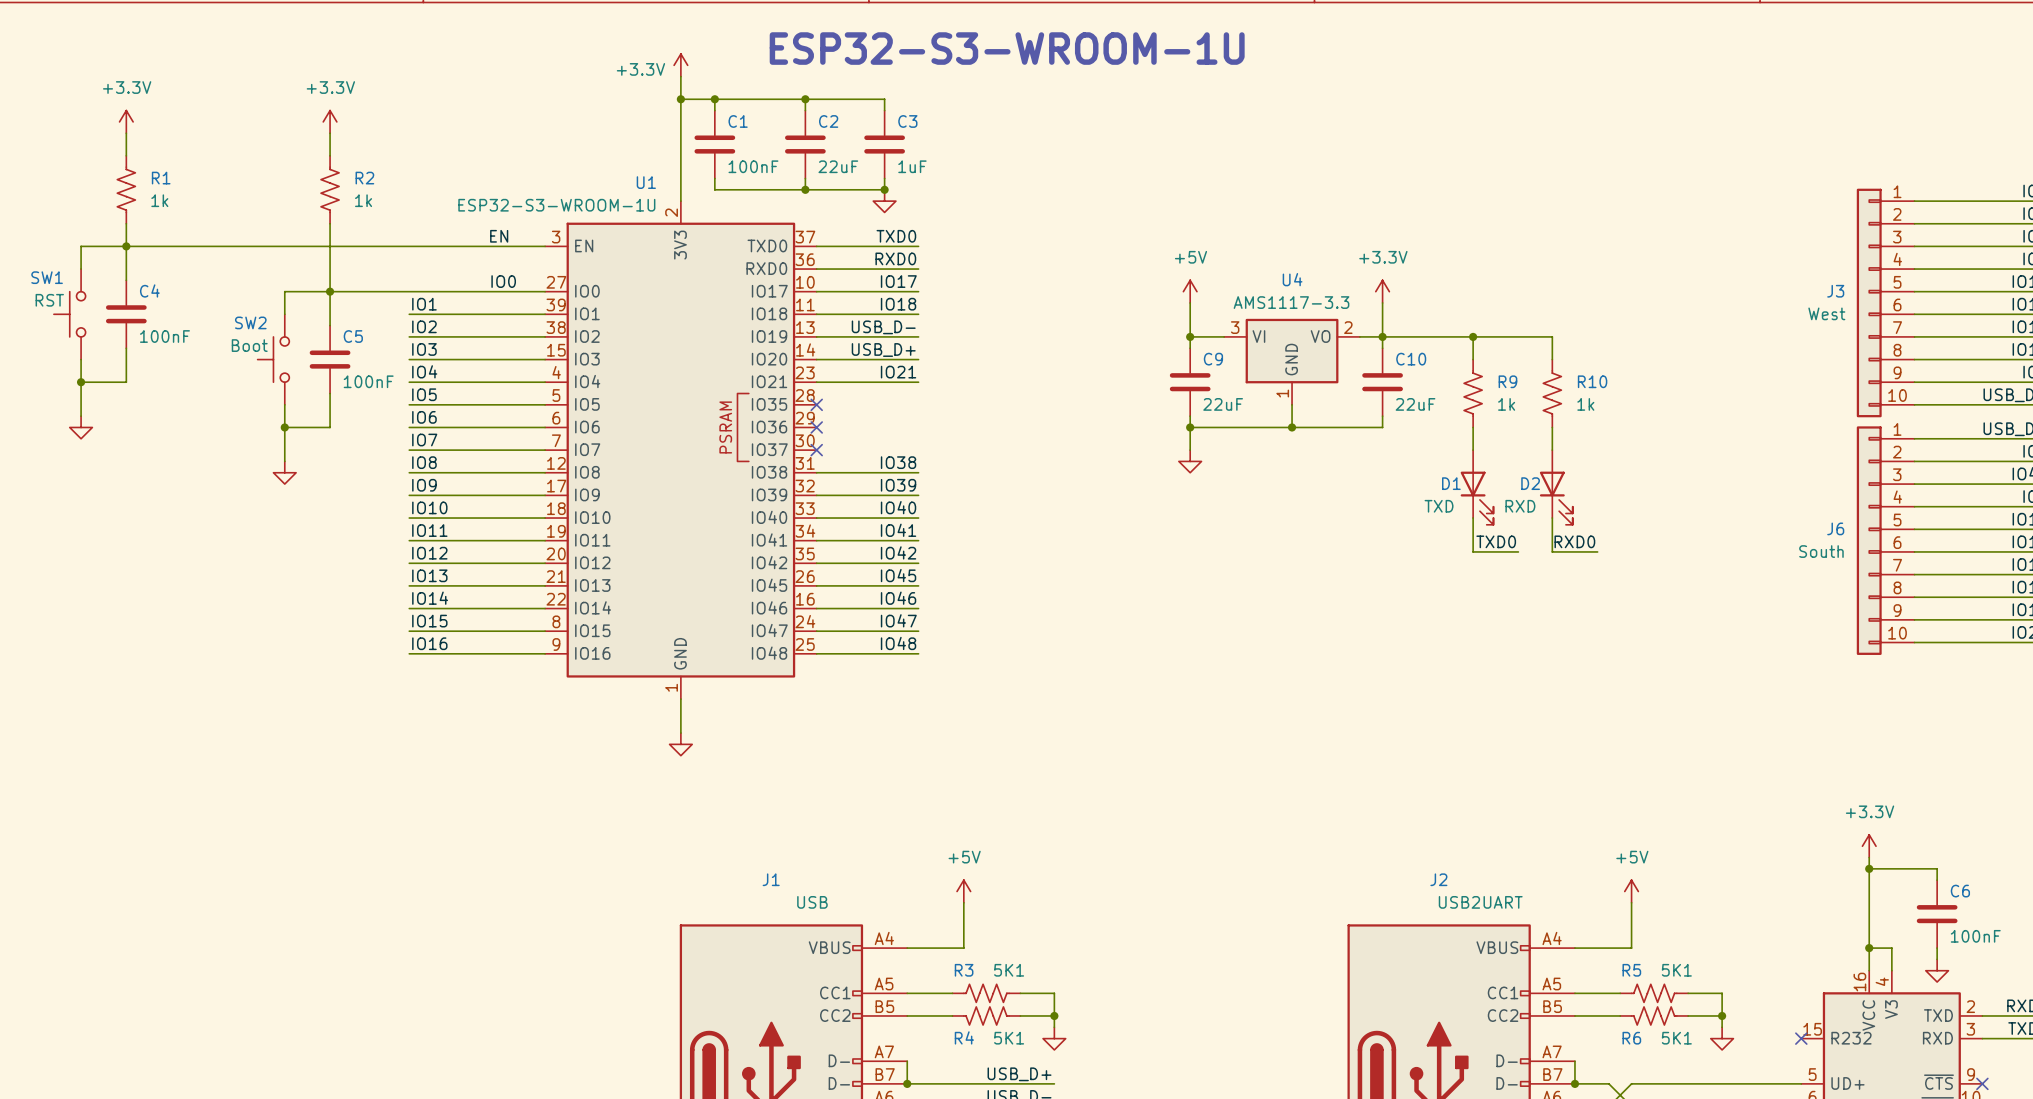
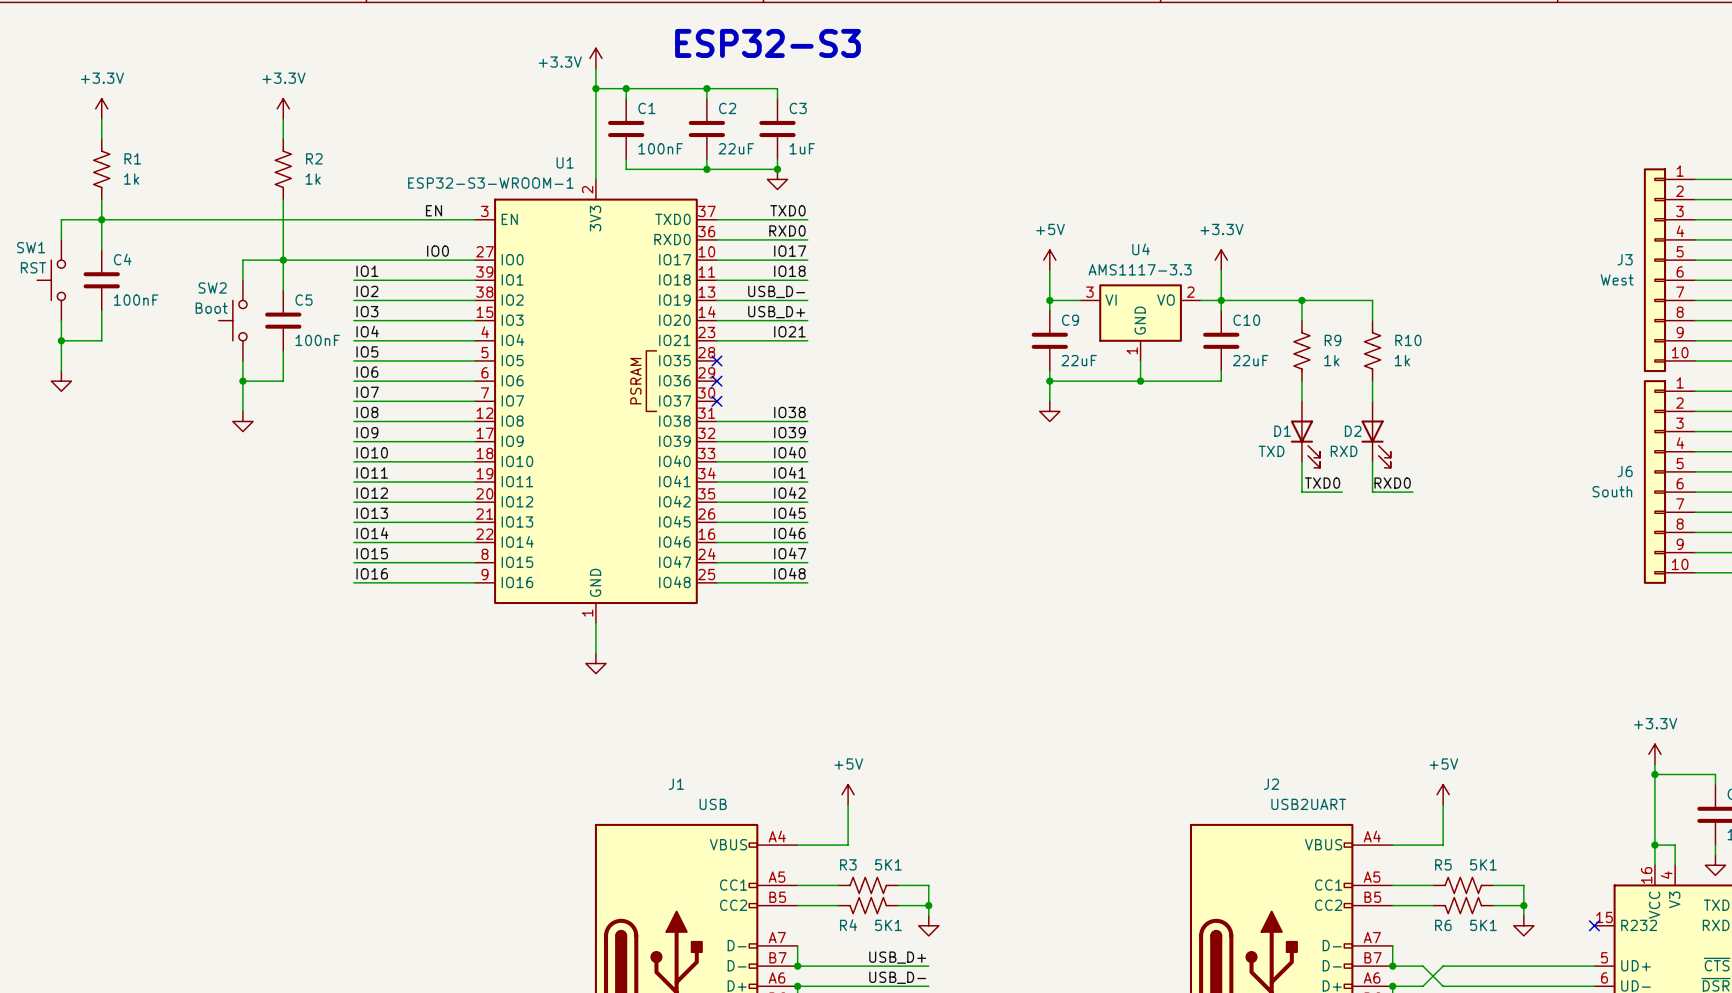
text: ESP32-S3-WROOM-1U (1007, 48) -> ESP32-S3 (767, 43)
U1 value: ESP32-S3-WROOM-1U (556, 205) -> ESP32-S3-WROOM-1 (490, 183)

